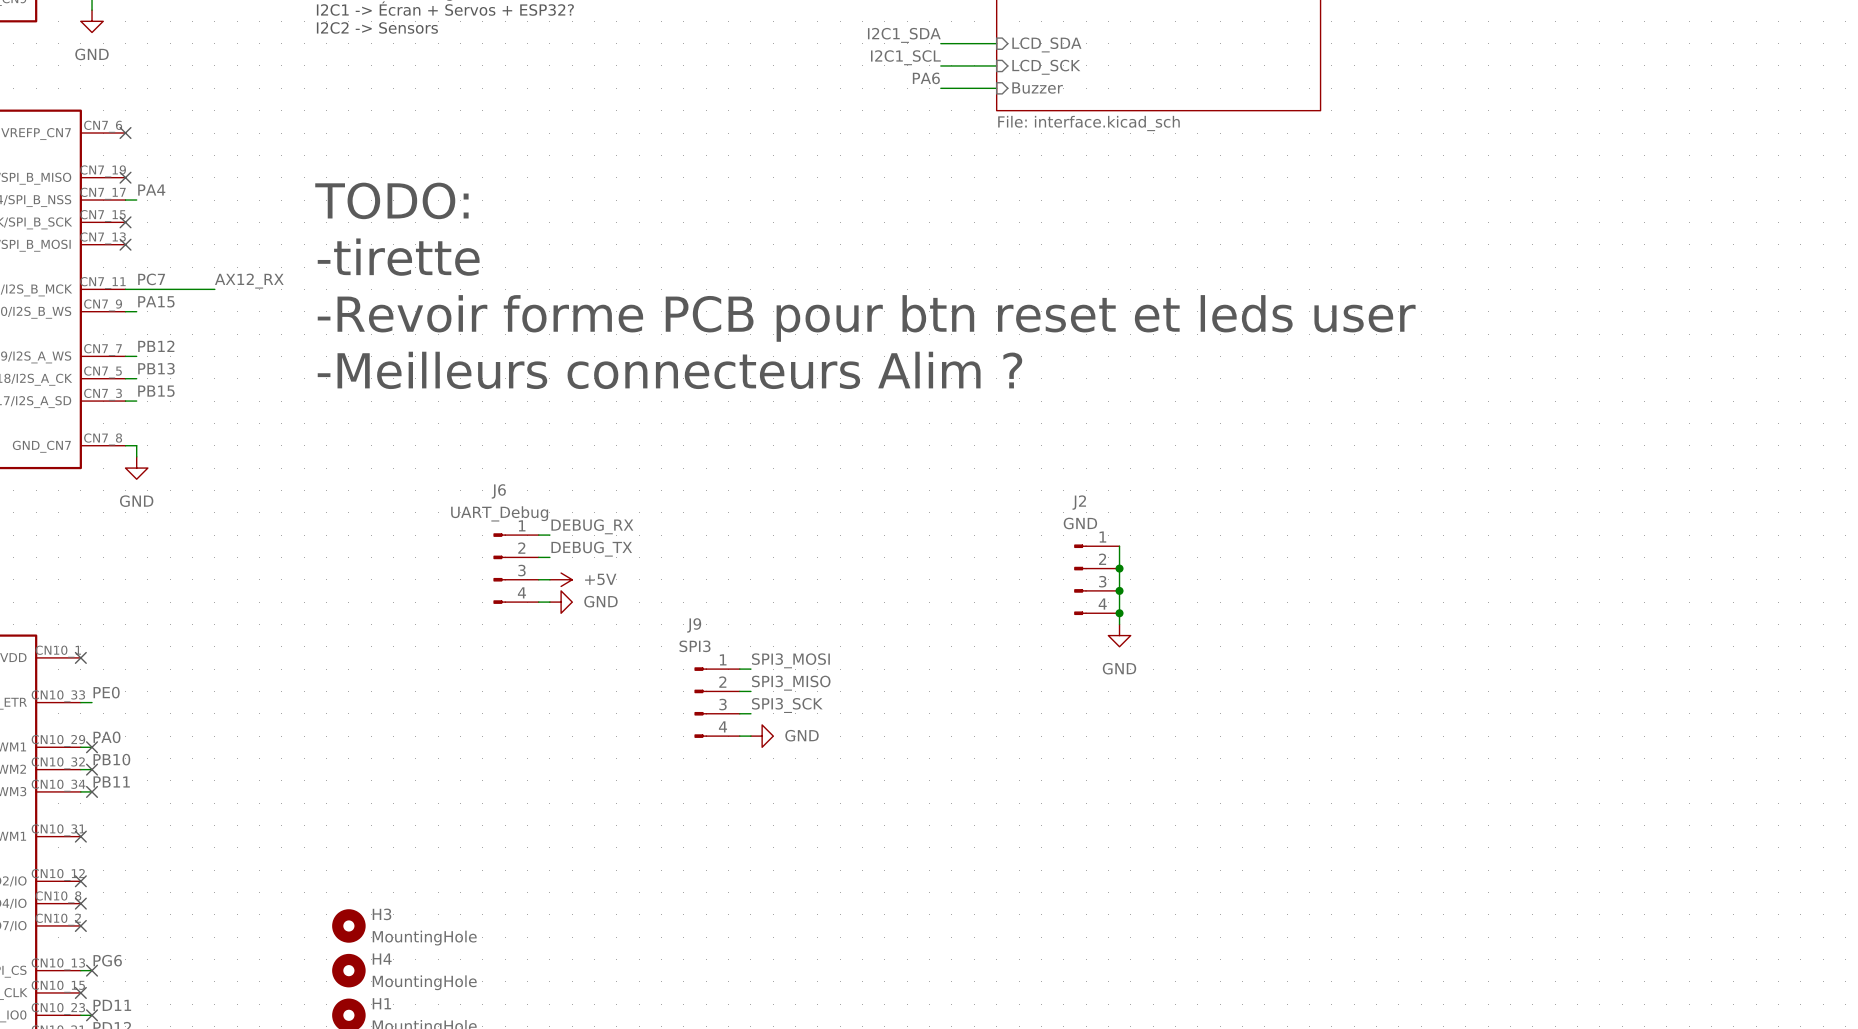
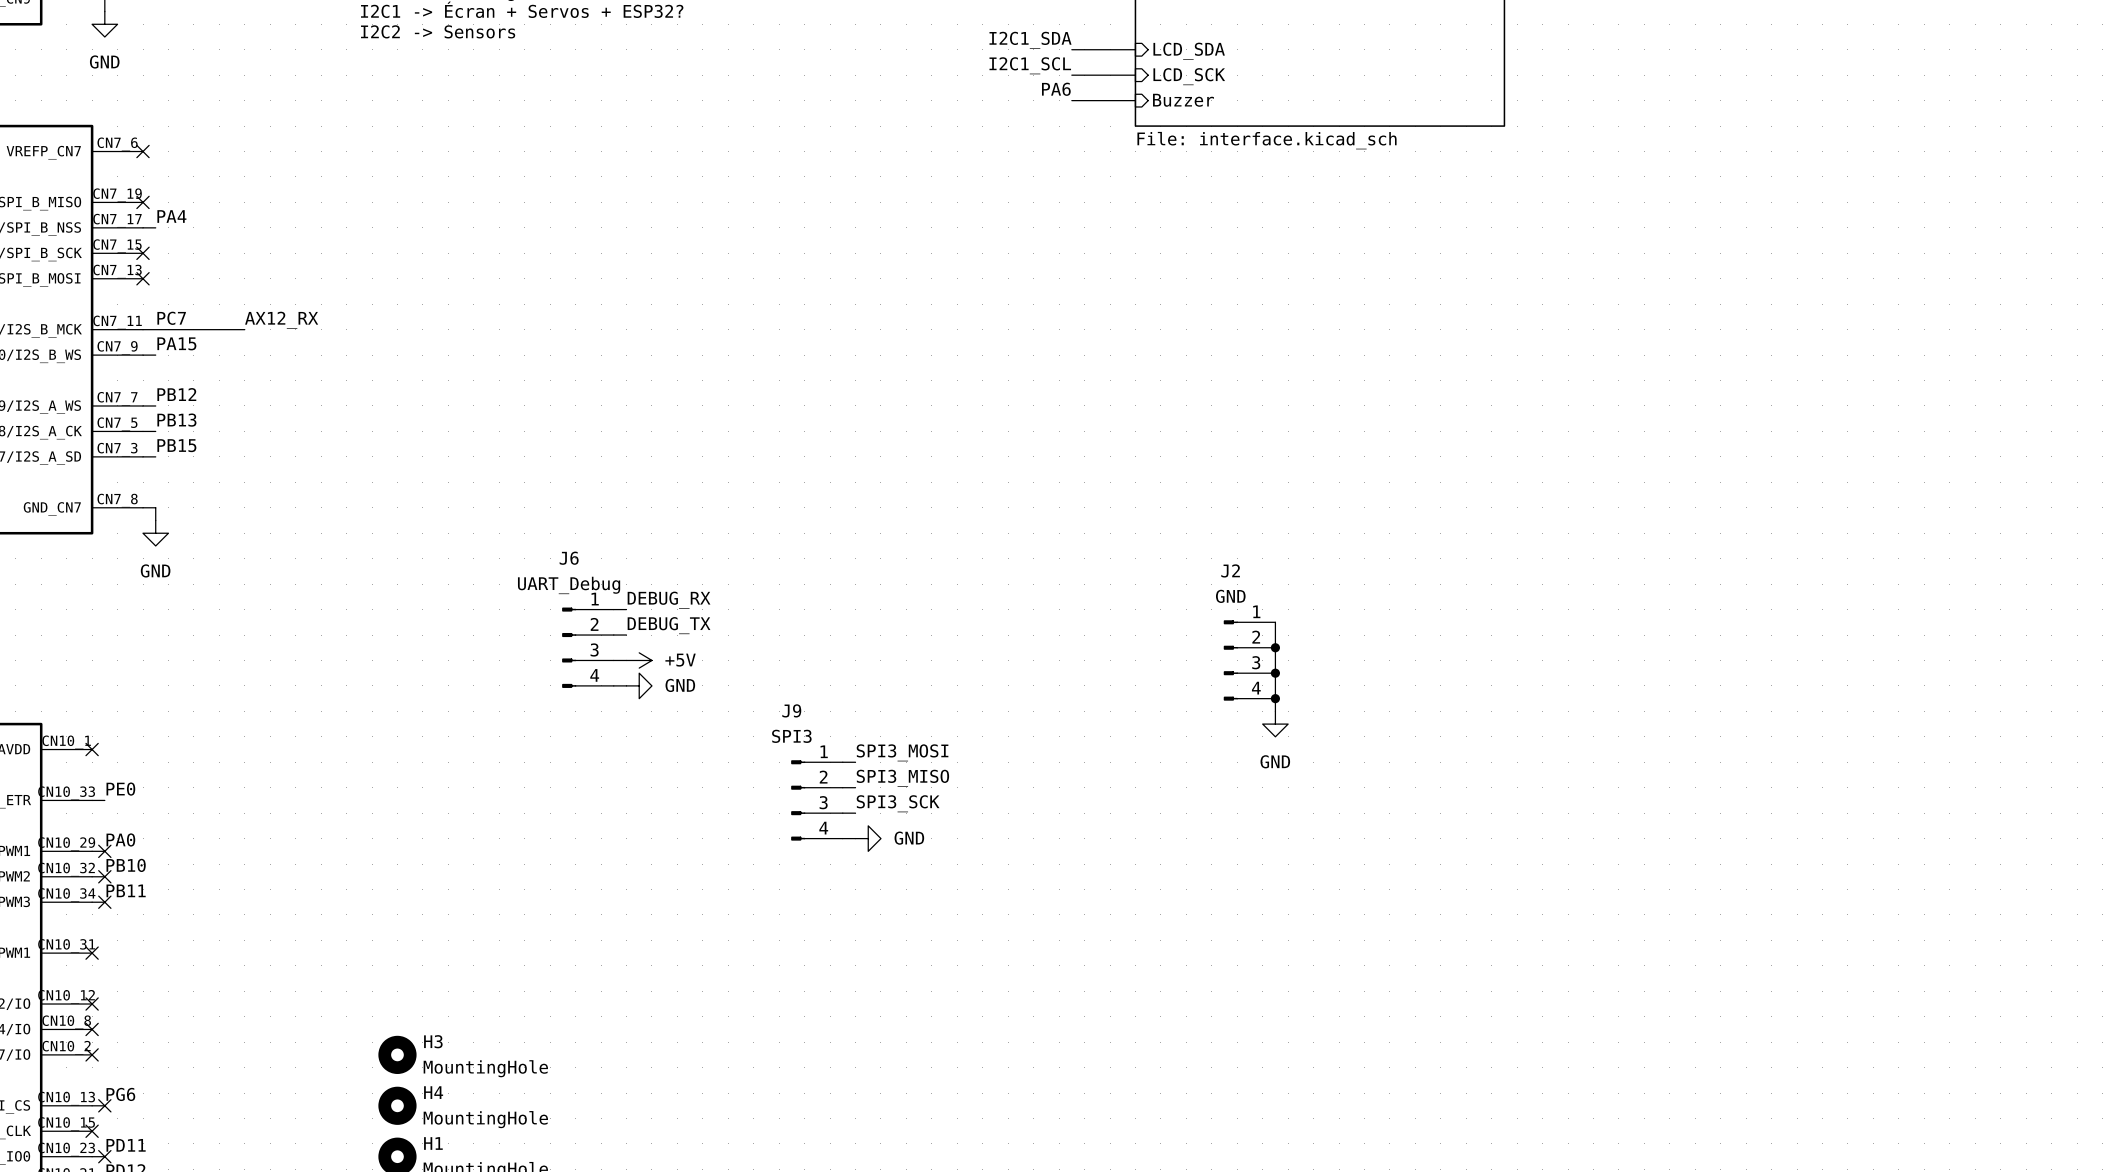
text: TODO: (391, 200) -> none
text: -tirette (398, 257) -> none
text: -Revoir forme PCB pour btn reset et leds user (866, 318) -> none
text: -Meilleurs connecteurs Alim ? (669, 370) -> none

